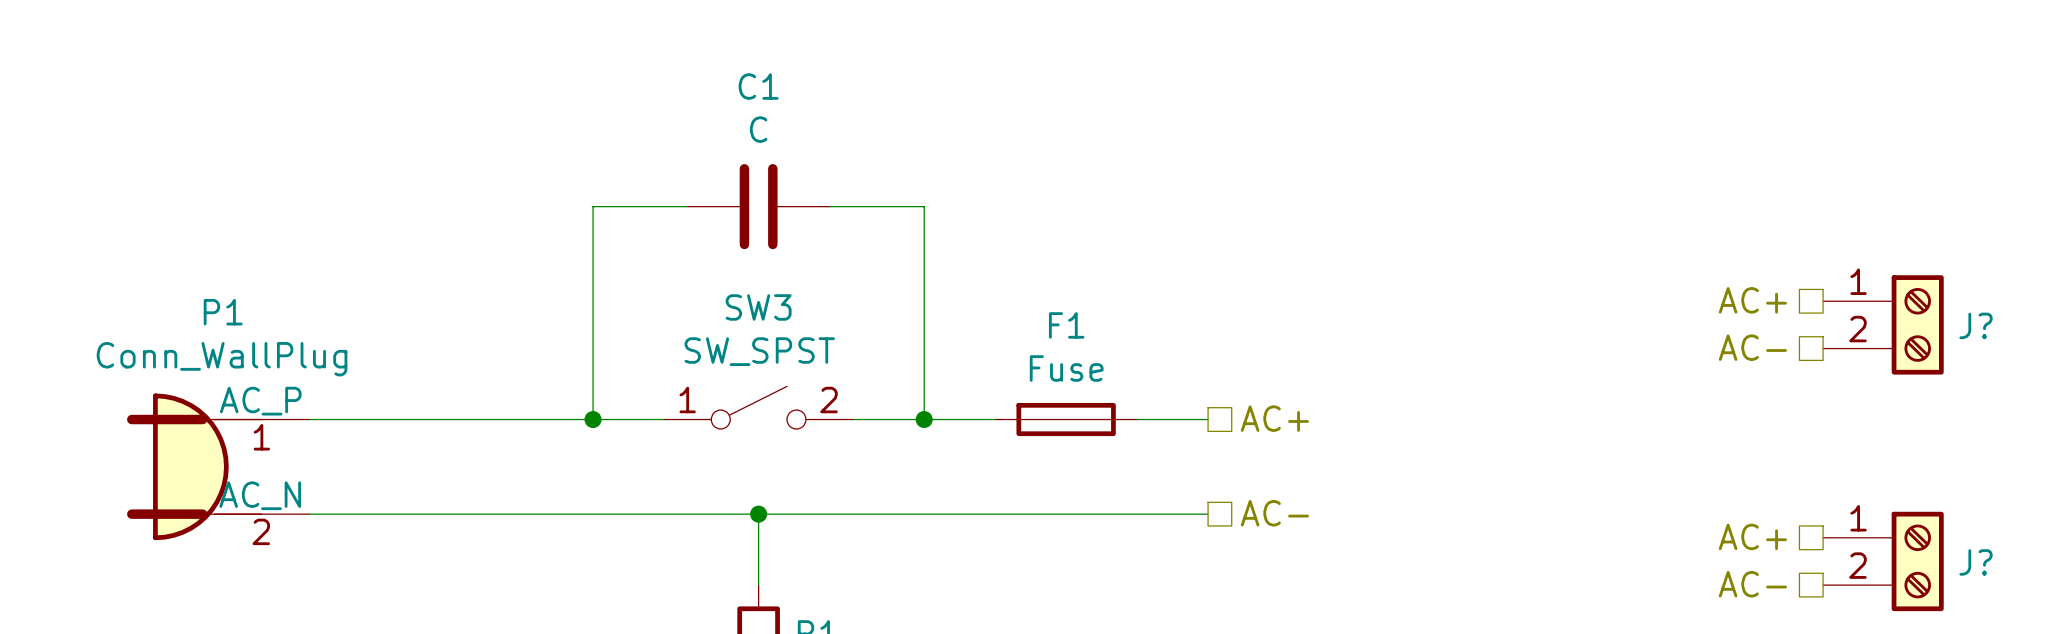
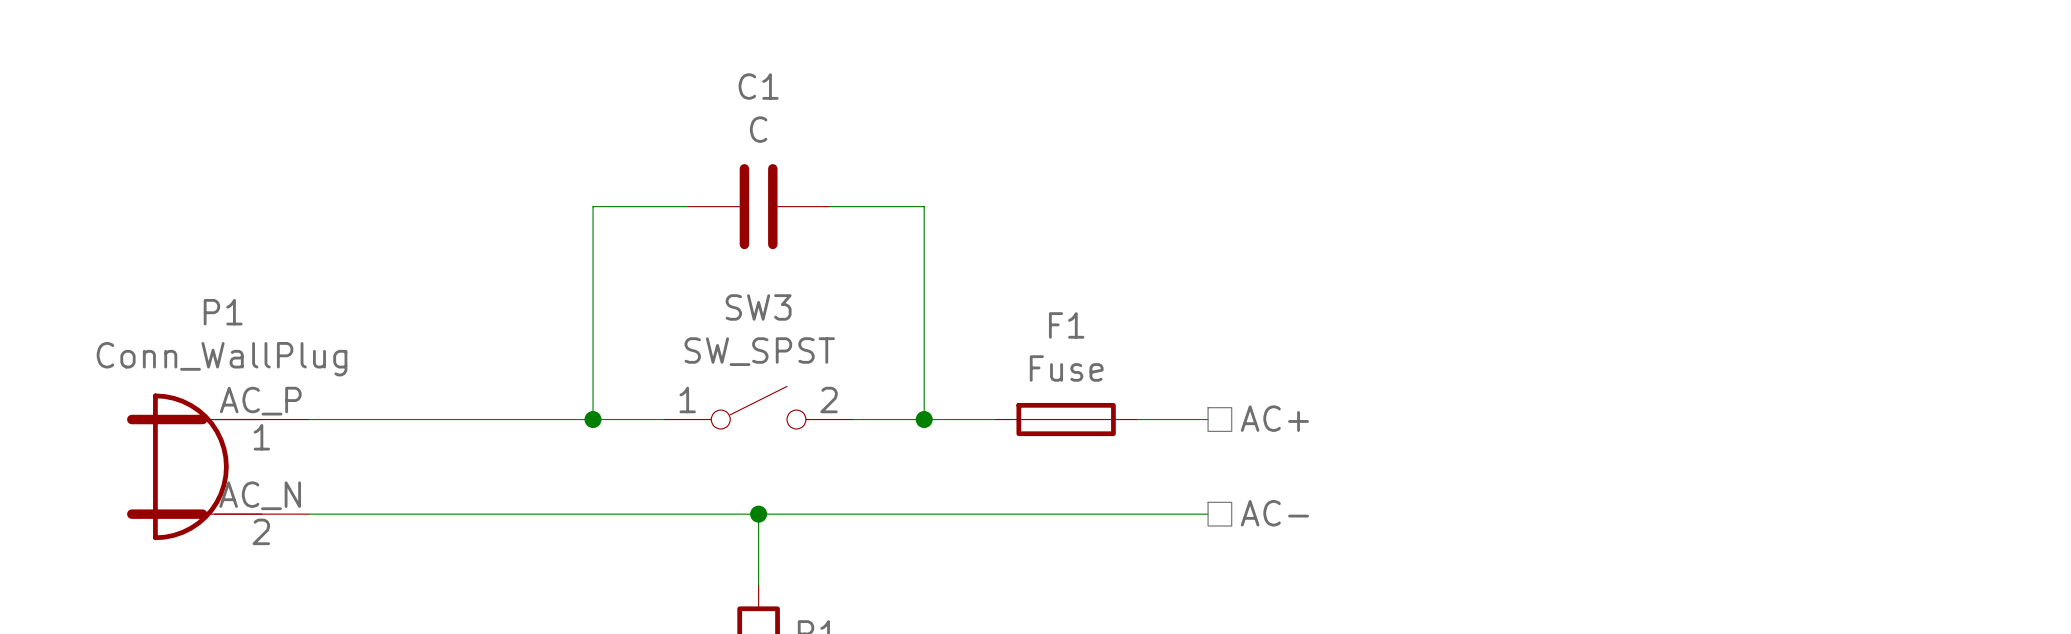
hierarchical label: AC+ (1752, 300) -> none
J?: (1883, 324) -> none
hierarchical label: AC- (1752, 347) -> none
hierarchical label: AC+ (1752, 536) -> none
J?: (1883, 561) -> none
hierarchical label: AC- (1752, 584) -> none

